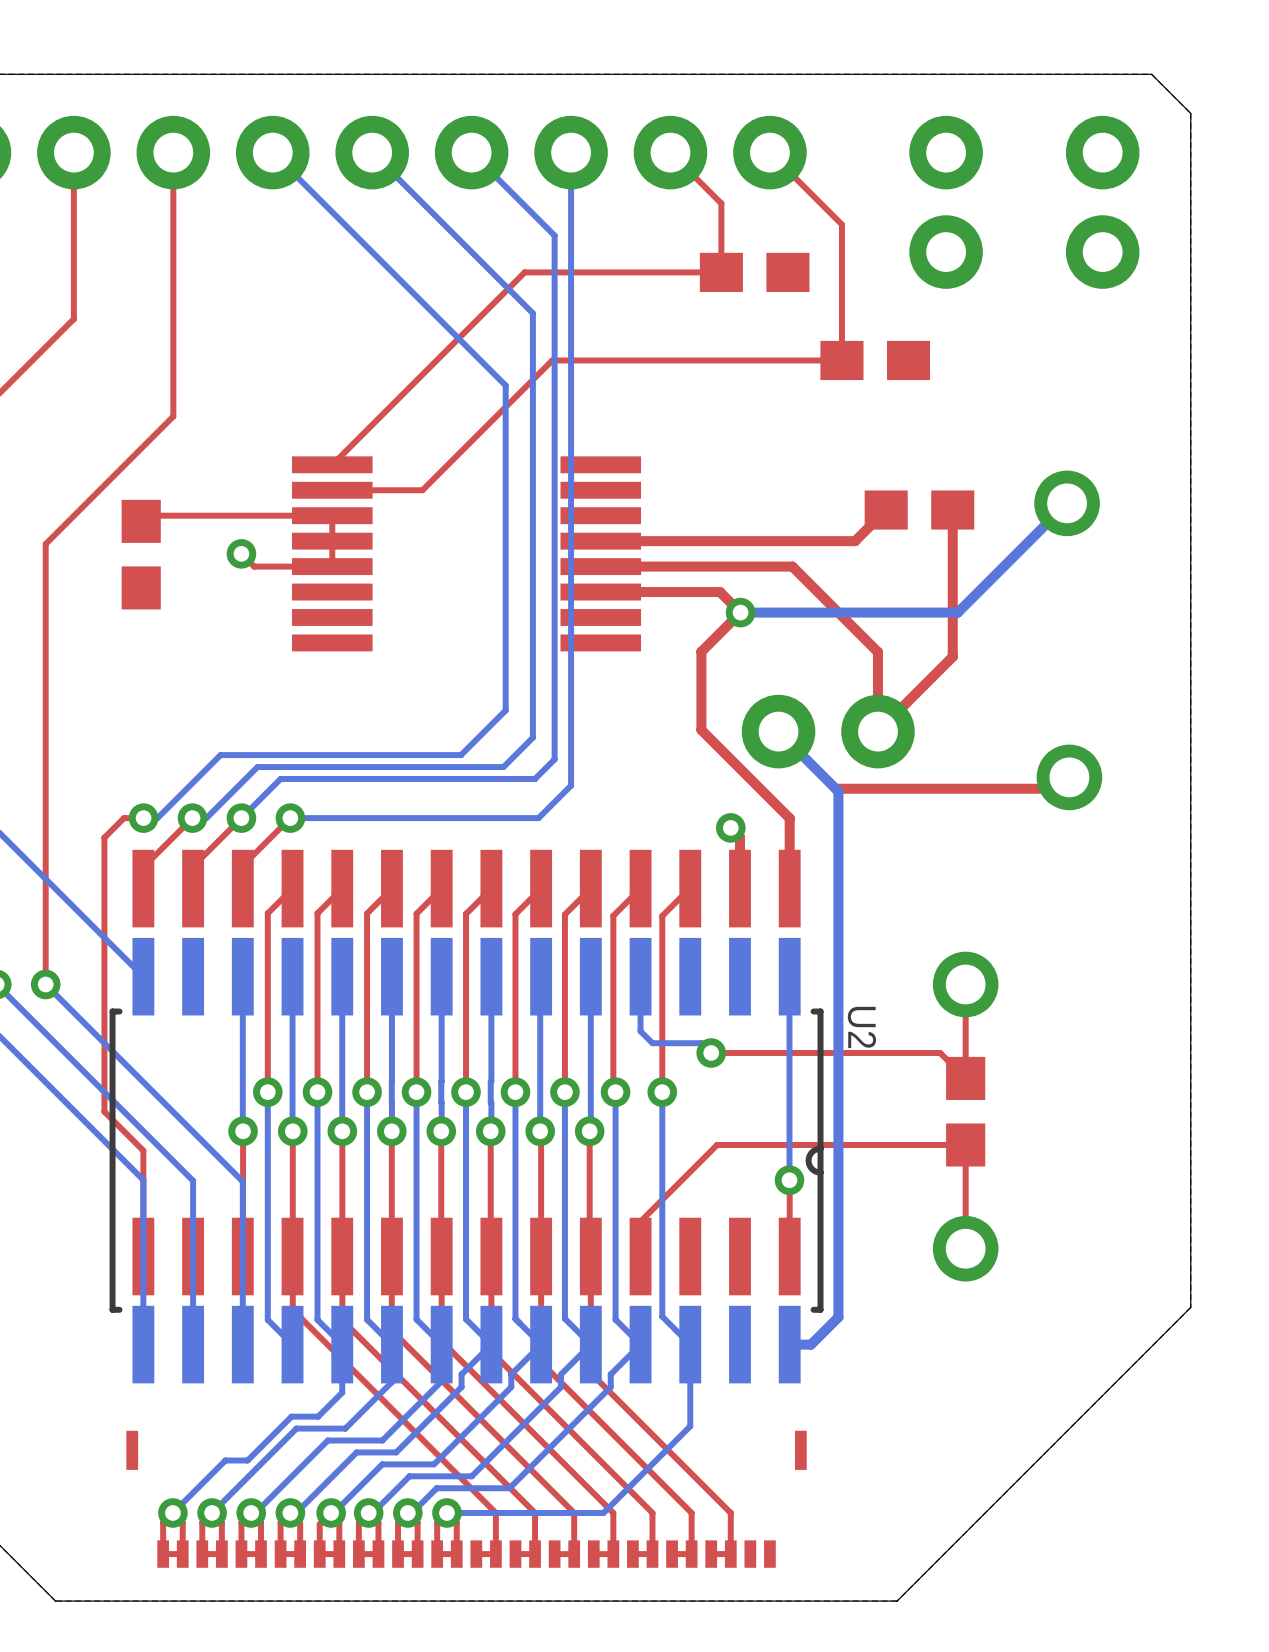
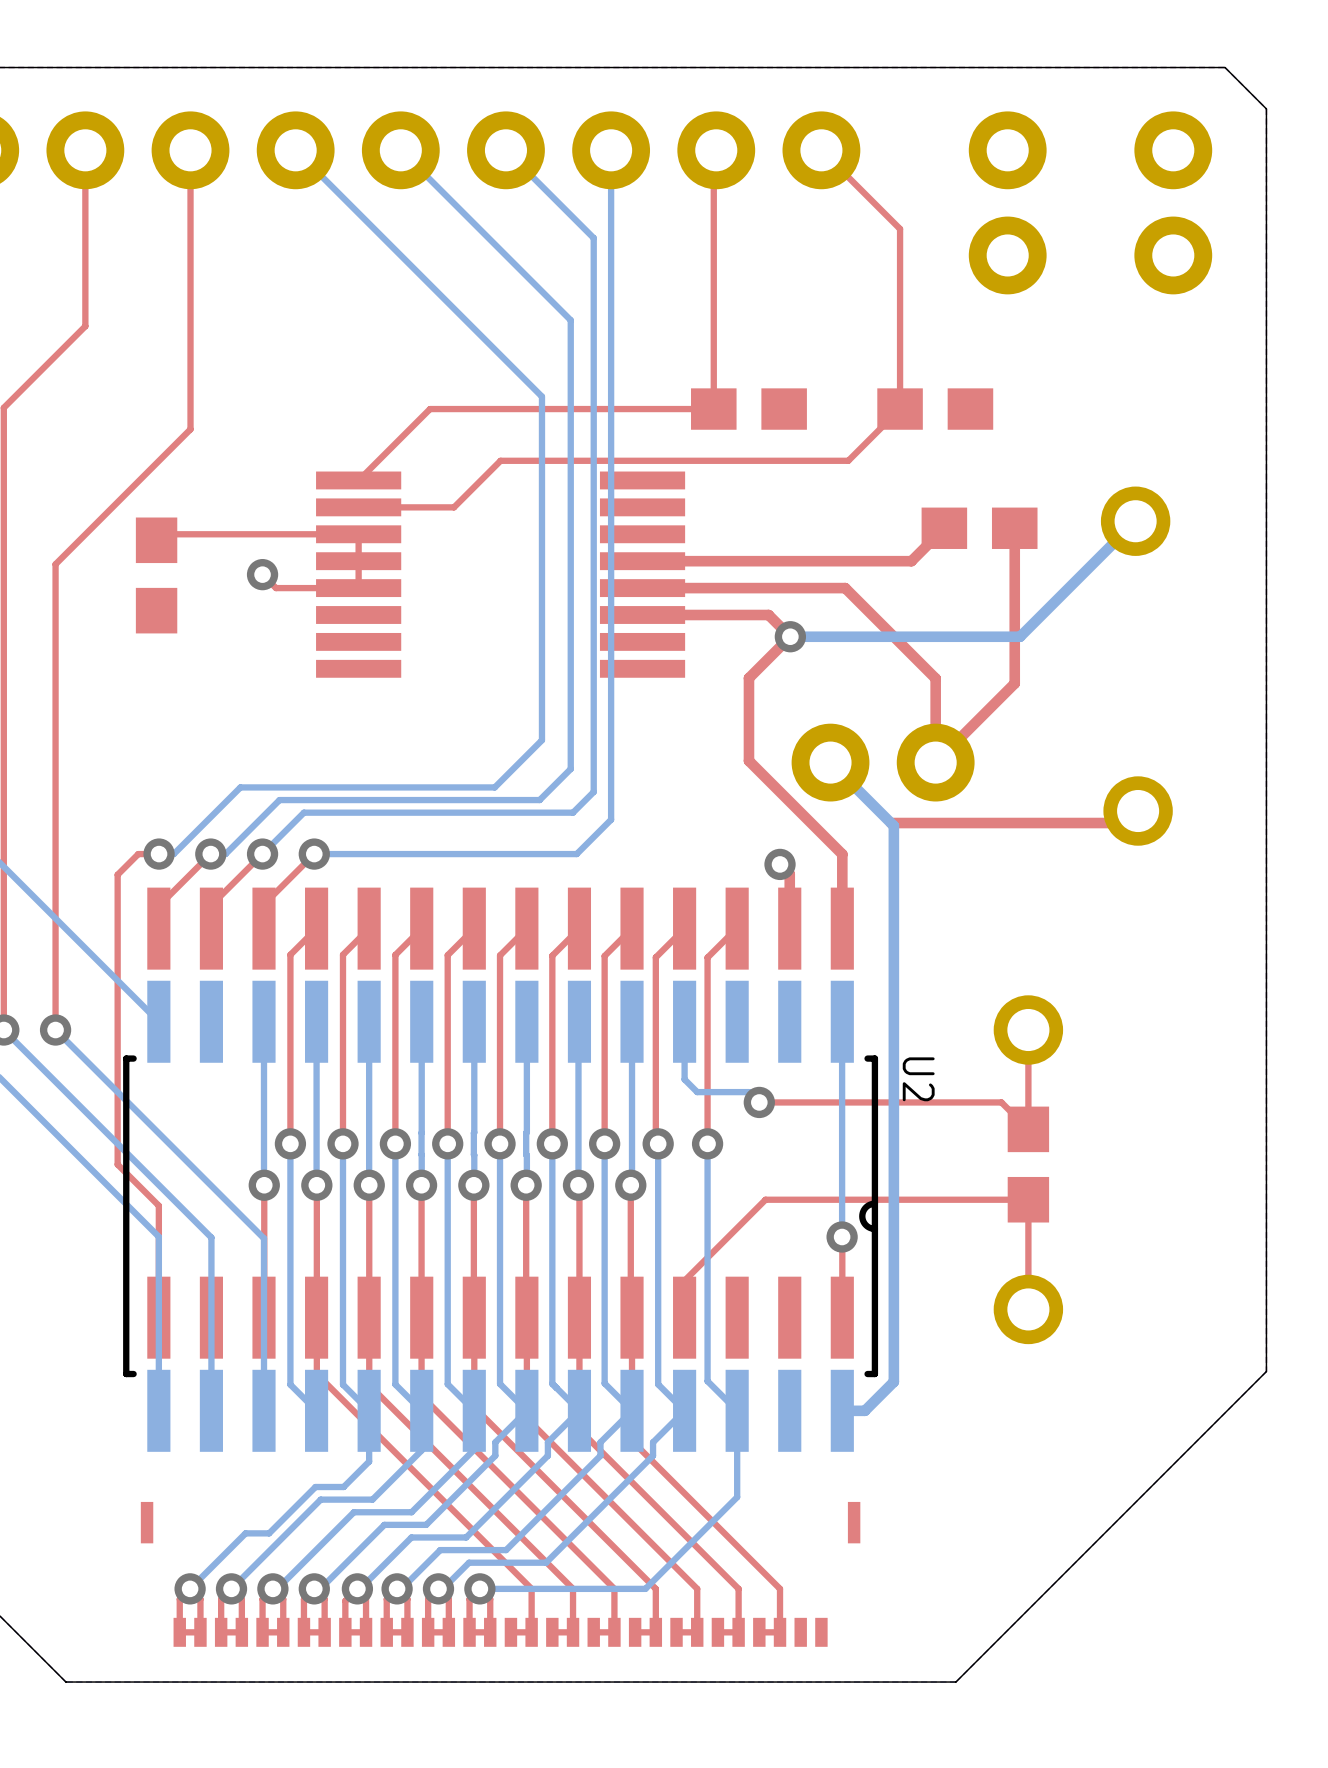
top track: (671, 153) (721, 203) (721, 272) (524, 272) (399, 397) -> (717, 151) (713, 154) (713, 409) (430, 409)
top track: (841, 224) (841, 360) (552, 360) (466, 446) -> (897, 226) (900, 228) (900, 409) (848, 460) (500, 460)
part position: (754, 272) -> (748, 409)
part position: (875, 360) -> (935, 409)

